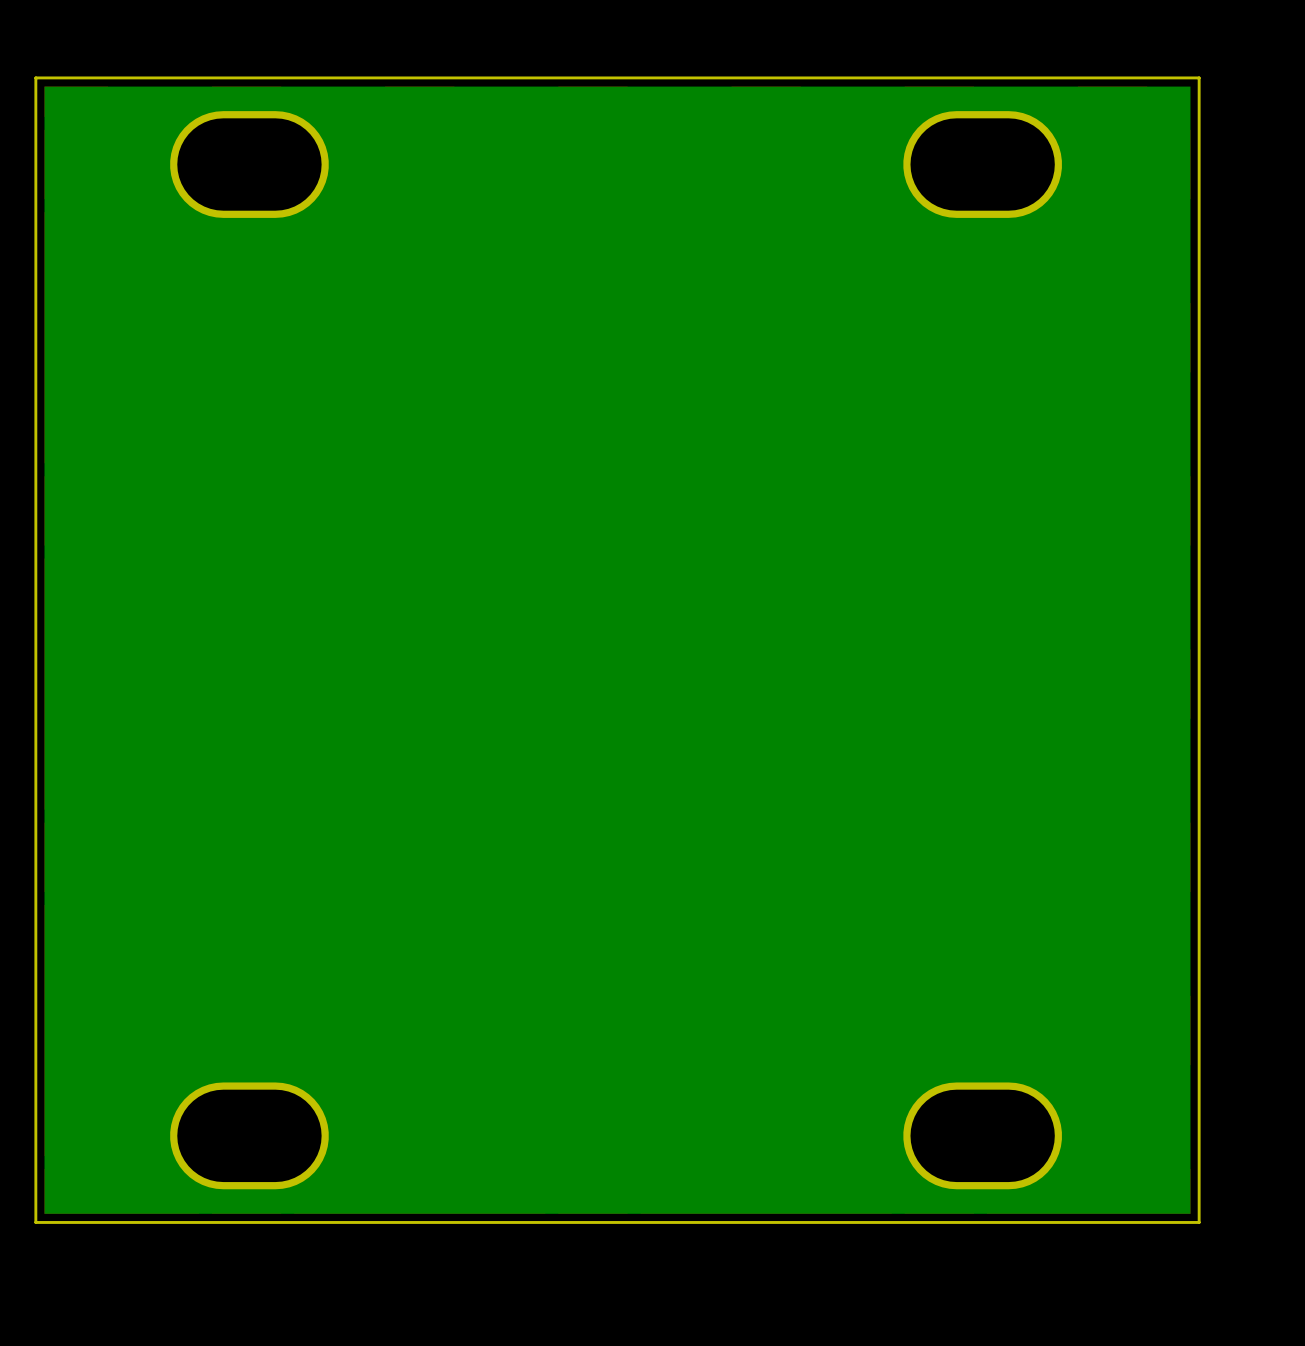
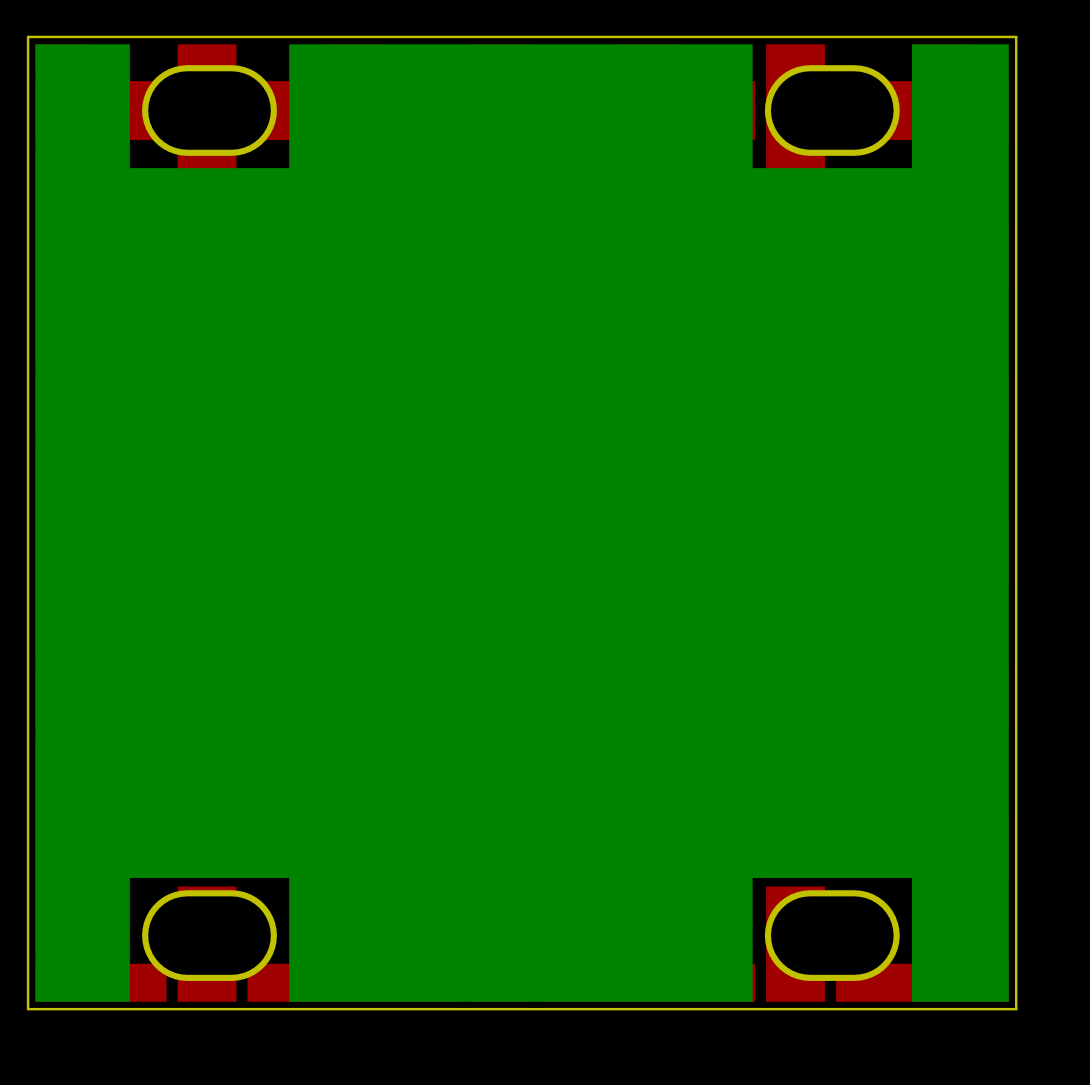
drawing shape: [44, 86, 1191, 1214] -> [129, 168, 912, 878]
drawing: none -> [35, 44, 130, 1002]
drawing: none -> [289, 44, 753, 169]
drawing: none -> [911, 44, 1009, 1002]
drawing: none -> [289, 877, 753, 1002]

